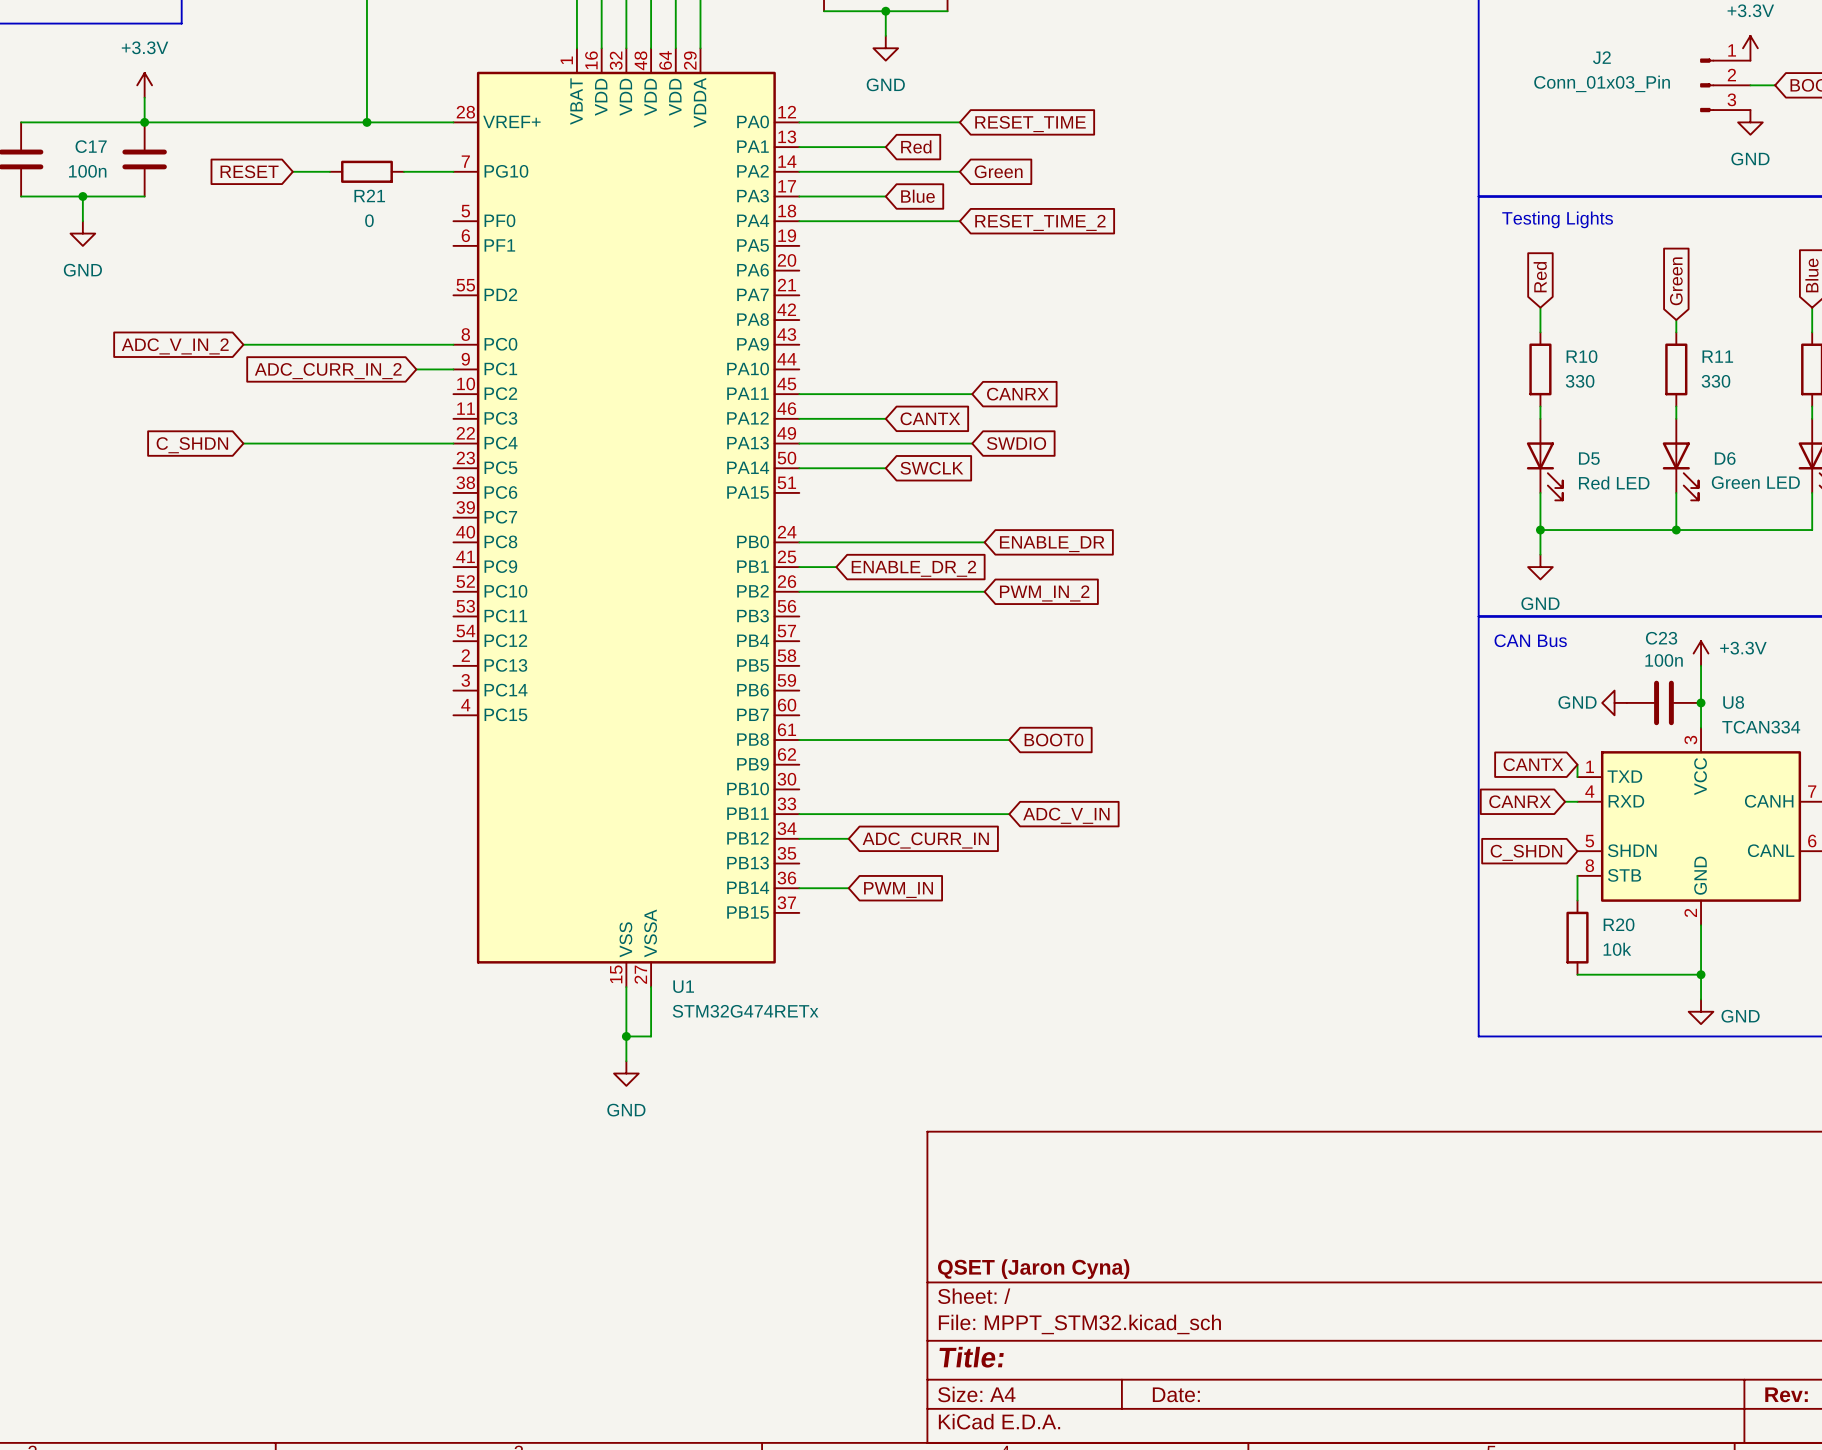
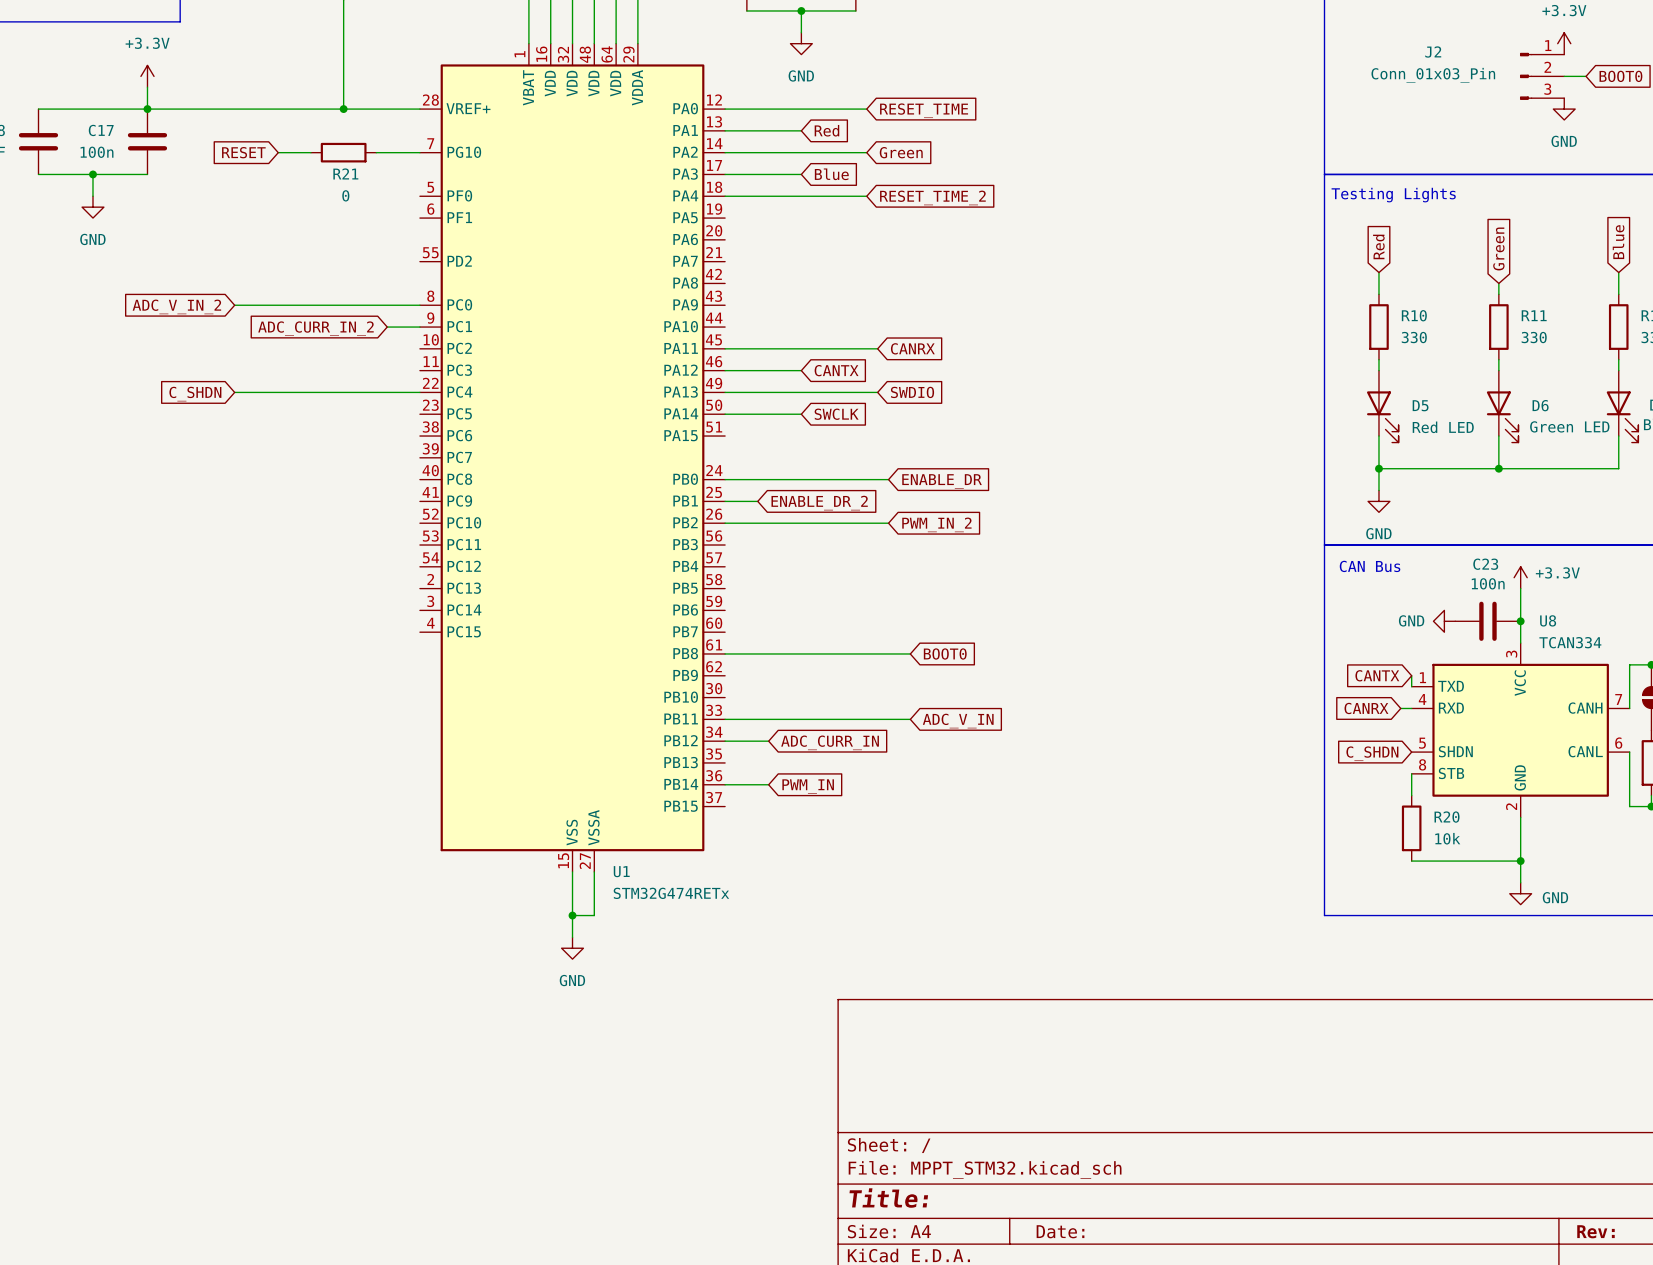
title block: QSET (Jaron Cyna) (1033, 1269) -> none

